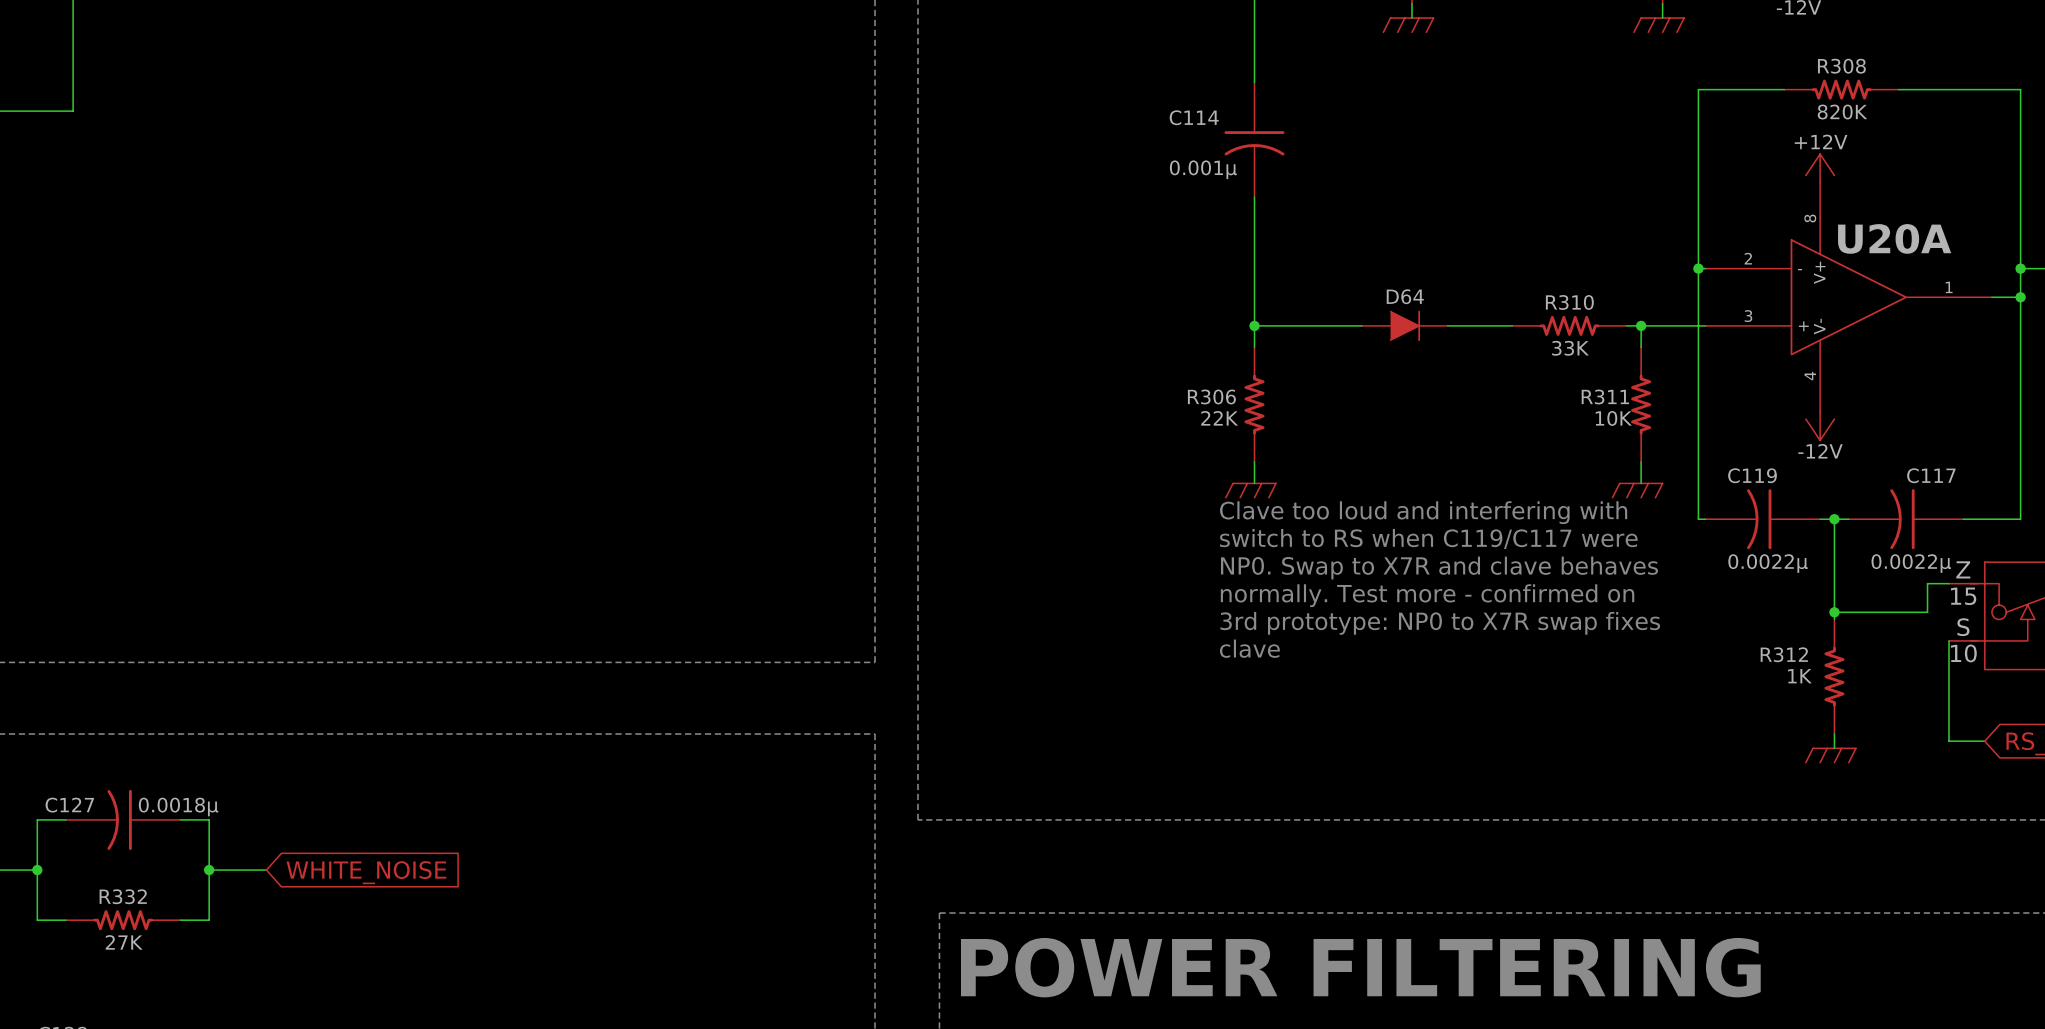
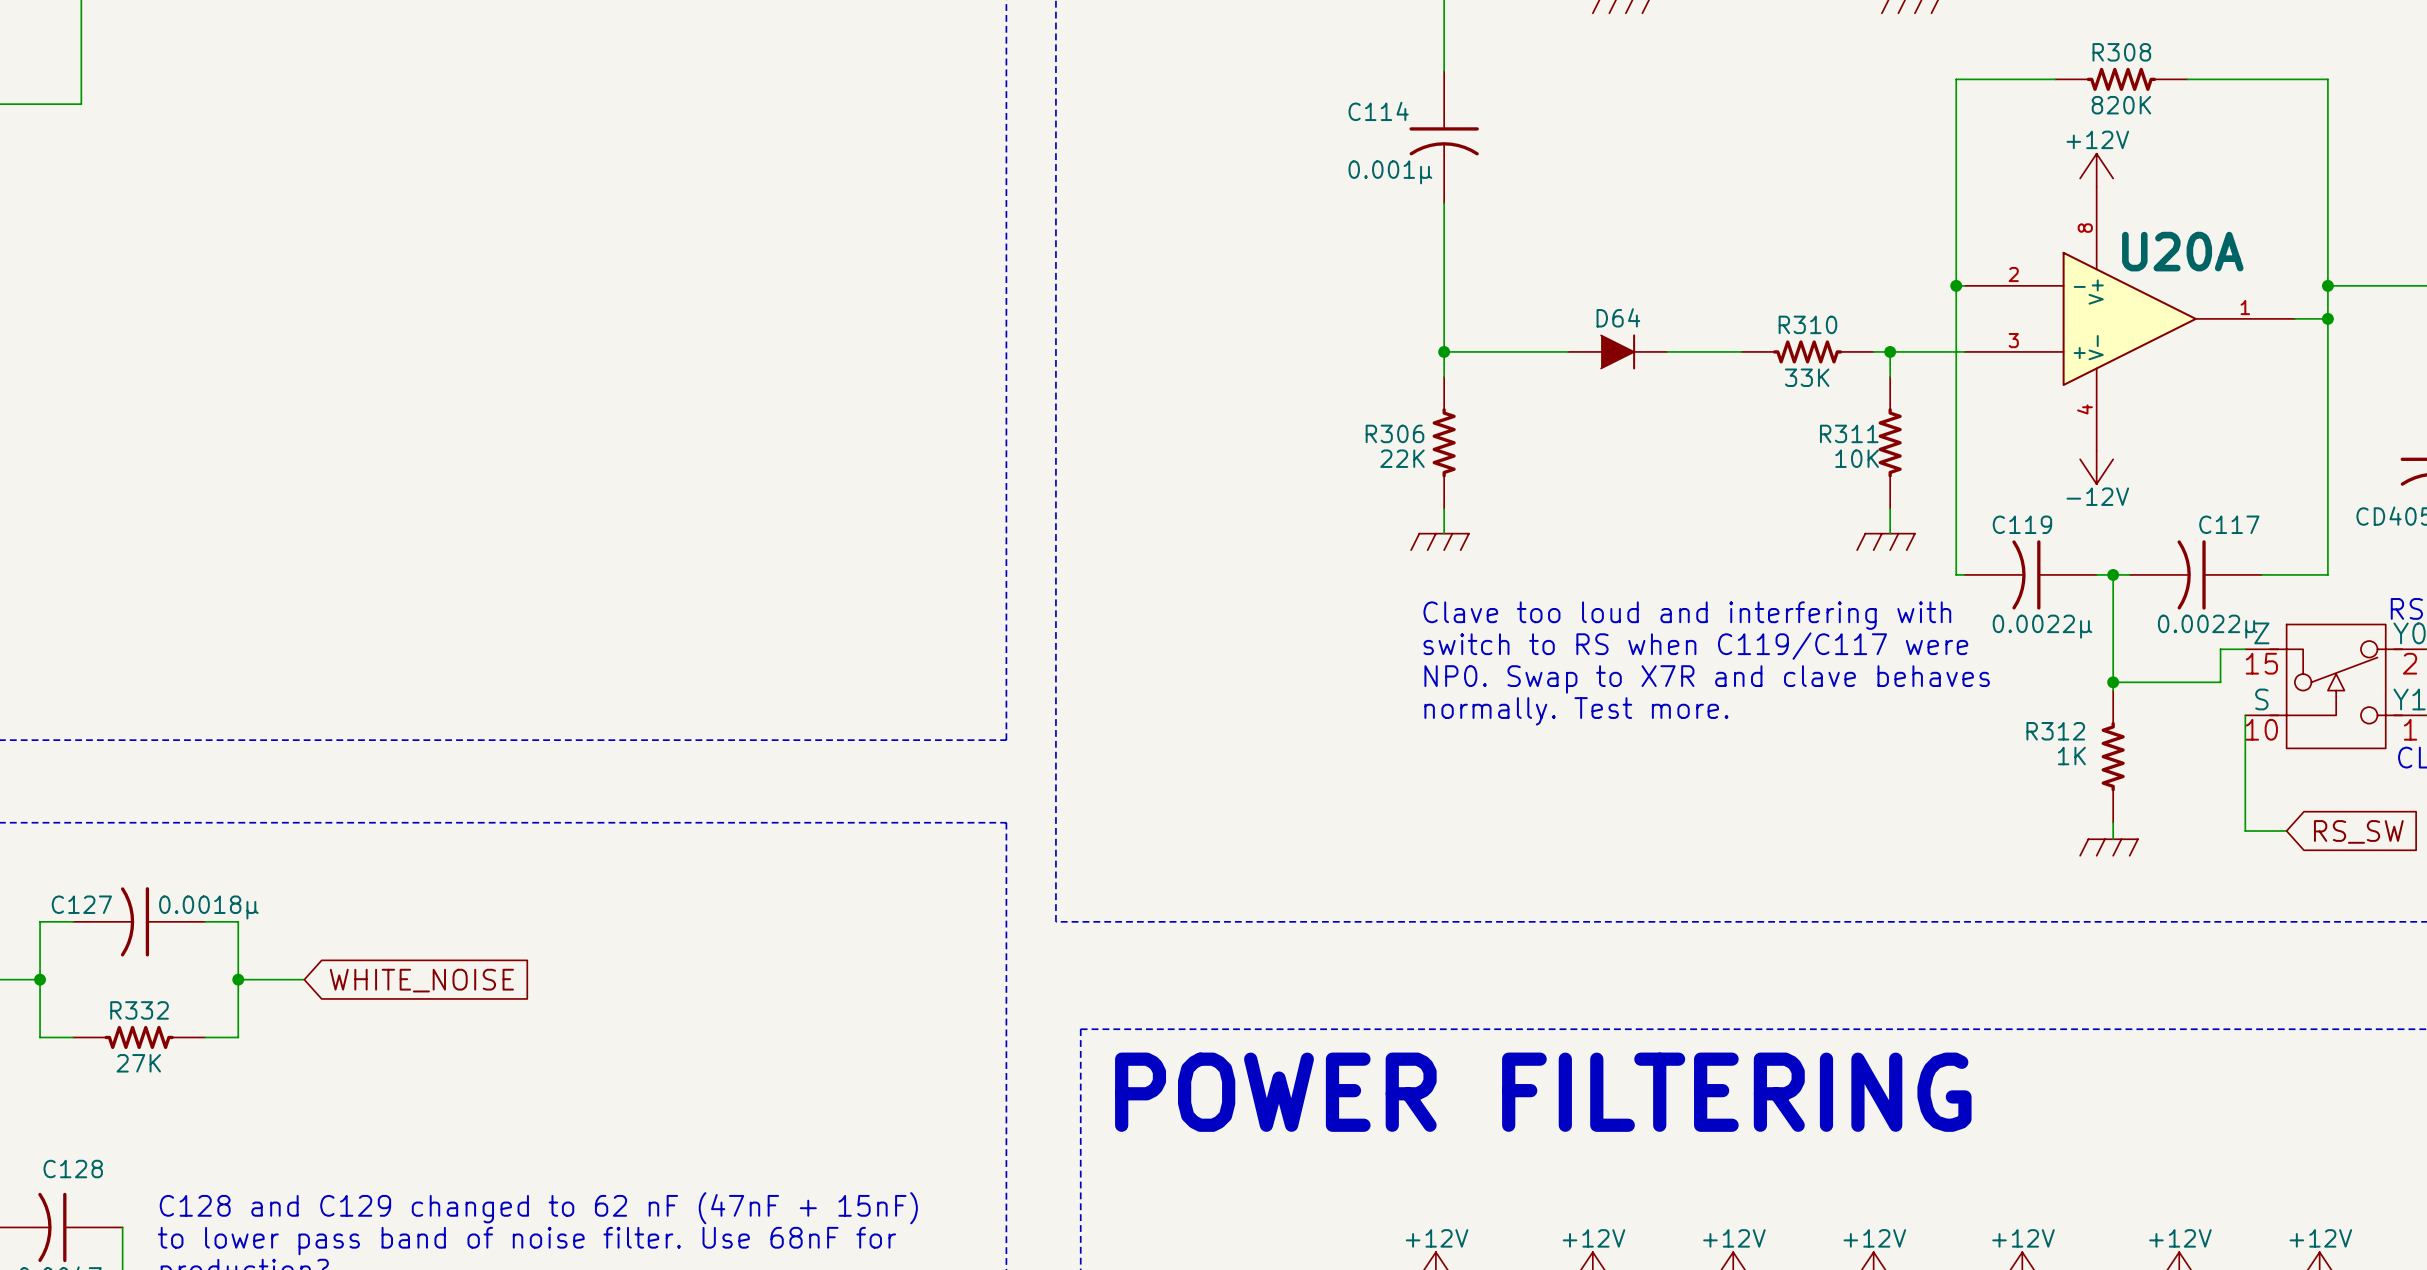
text position: Clave too loud and interfering with (1423, 512) -> Clave too loud and interfering with (1687, 615)
text position: switch to RS when C119/C117 were (1428, 538) -> switch to RS when C119/C117 were (1695, 646)
text position: NP0. Swap to X7R and clave behaves (1439, 568) -> NP0. Swap to X7R and clave behaves (1707, 679)
text: normally. Test more - confirmed on (1427, 595) -> none
text: 3rd prototype: NP0 to X7R swap fixes (1440, 623) -> none
text: none -> normally. Test more. (1576, 711)
text: clave (1249, 648) -> none

